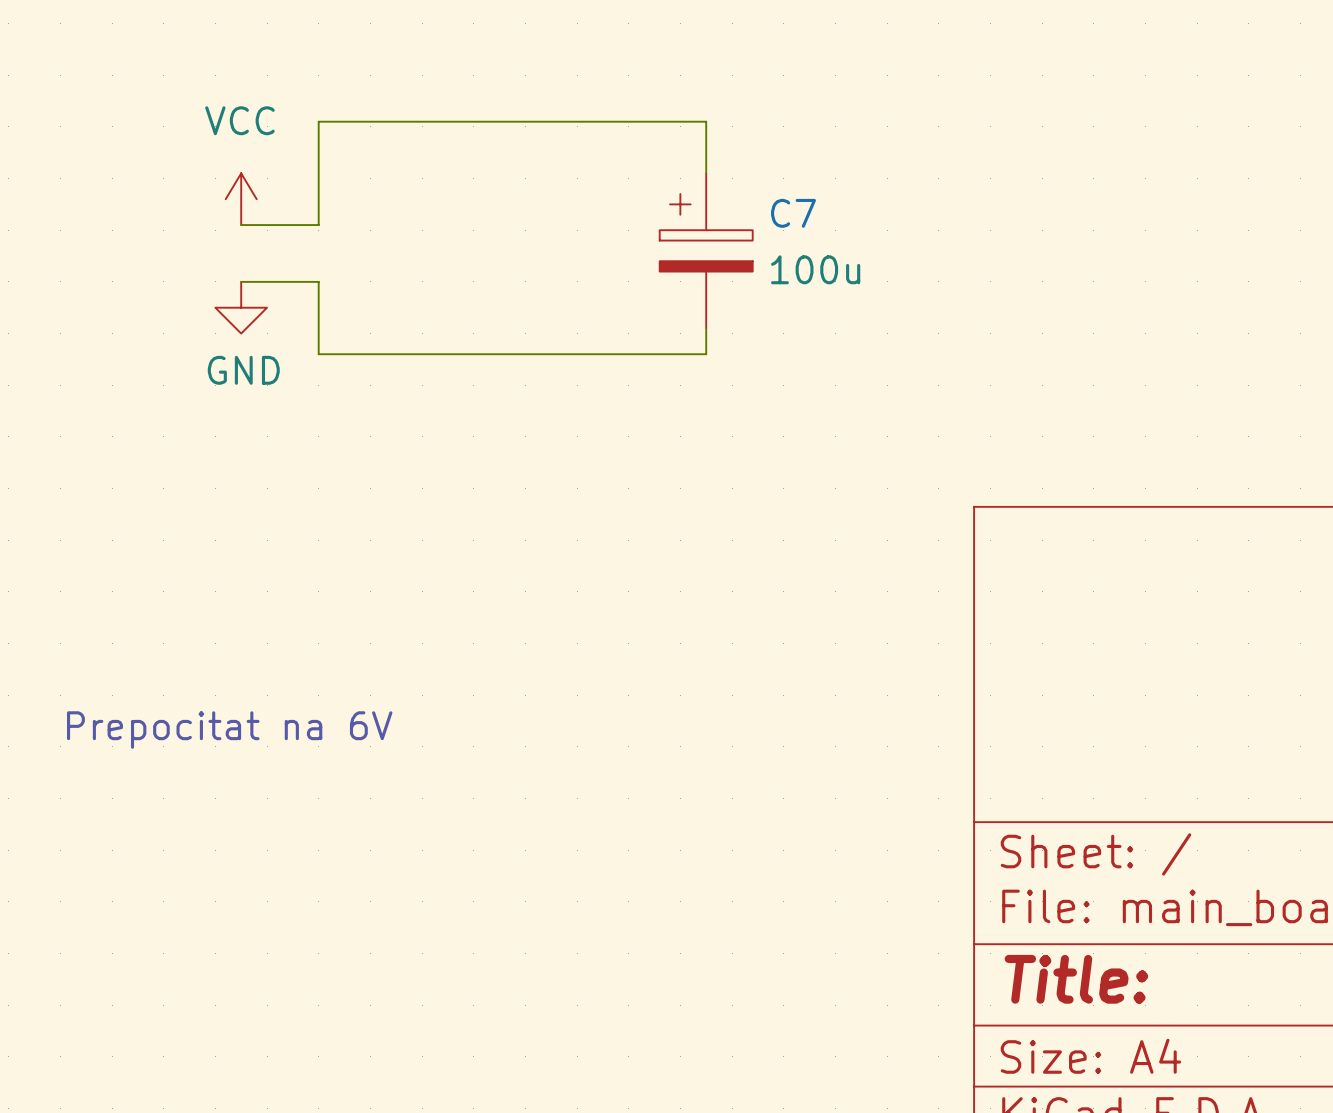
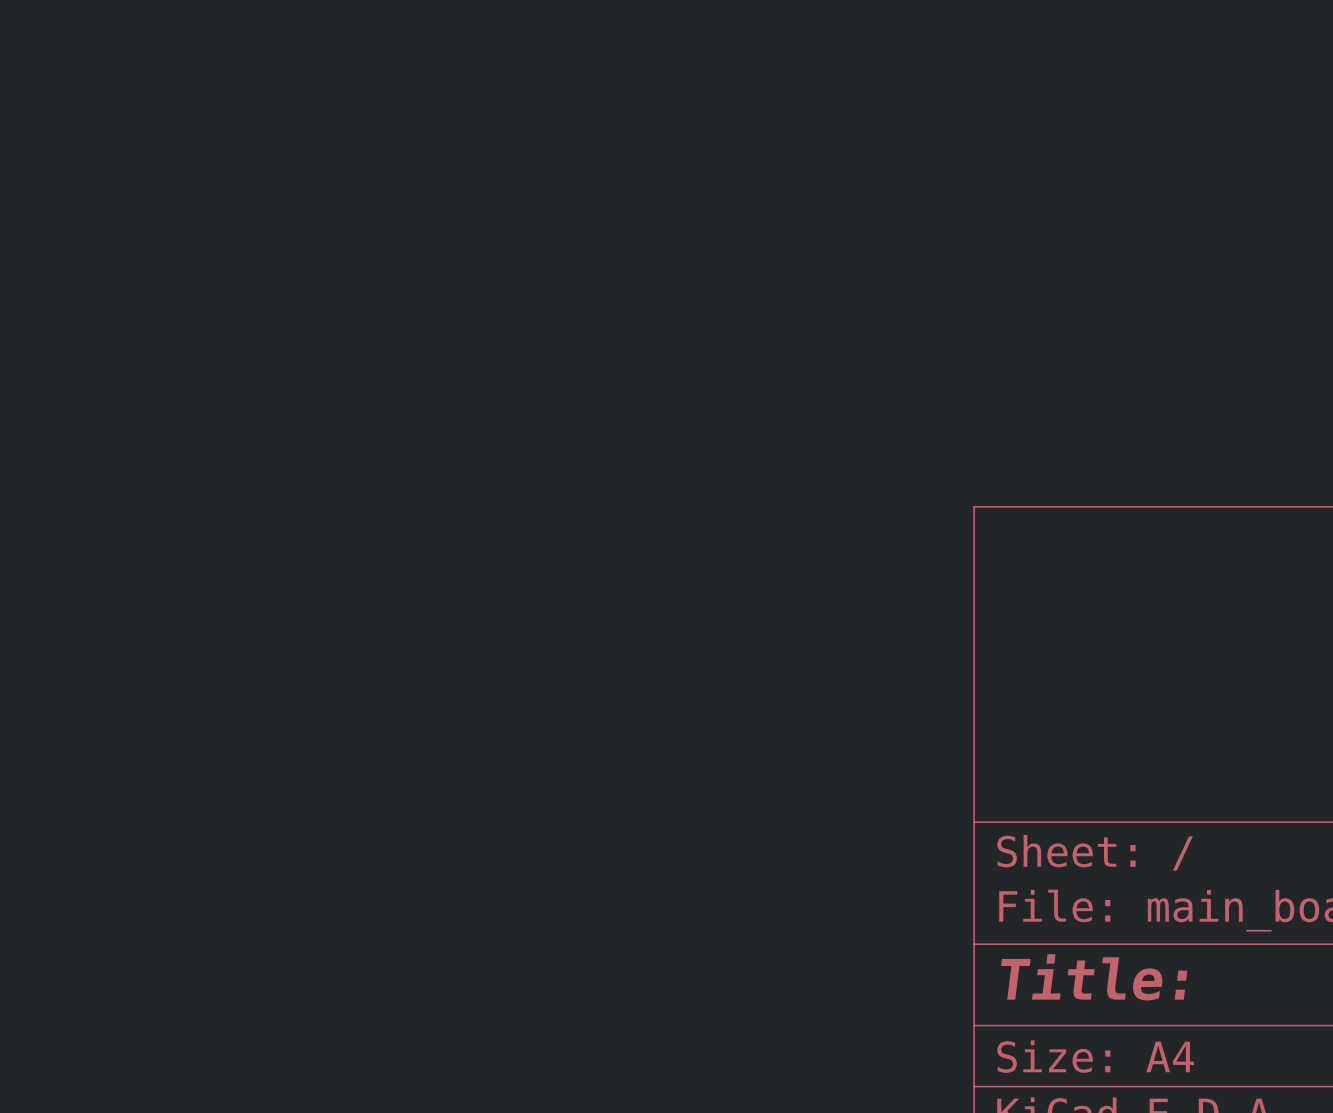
wire: (706, 173) (706, 121) (318, 121) (318, 225) (241, 225) -> none
power symbol: VCC (241, 199) -> none
C7: 100u (706, 250) -> none
wire: (241, 281) (318, 281) (318, 354) (706, 354) (706, 328) -> none
power symbol: GND (241, 307) -> none
text: Prepocitat na 6V (229, 730) -> none

